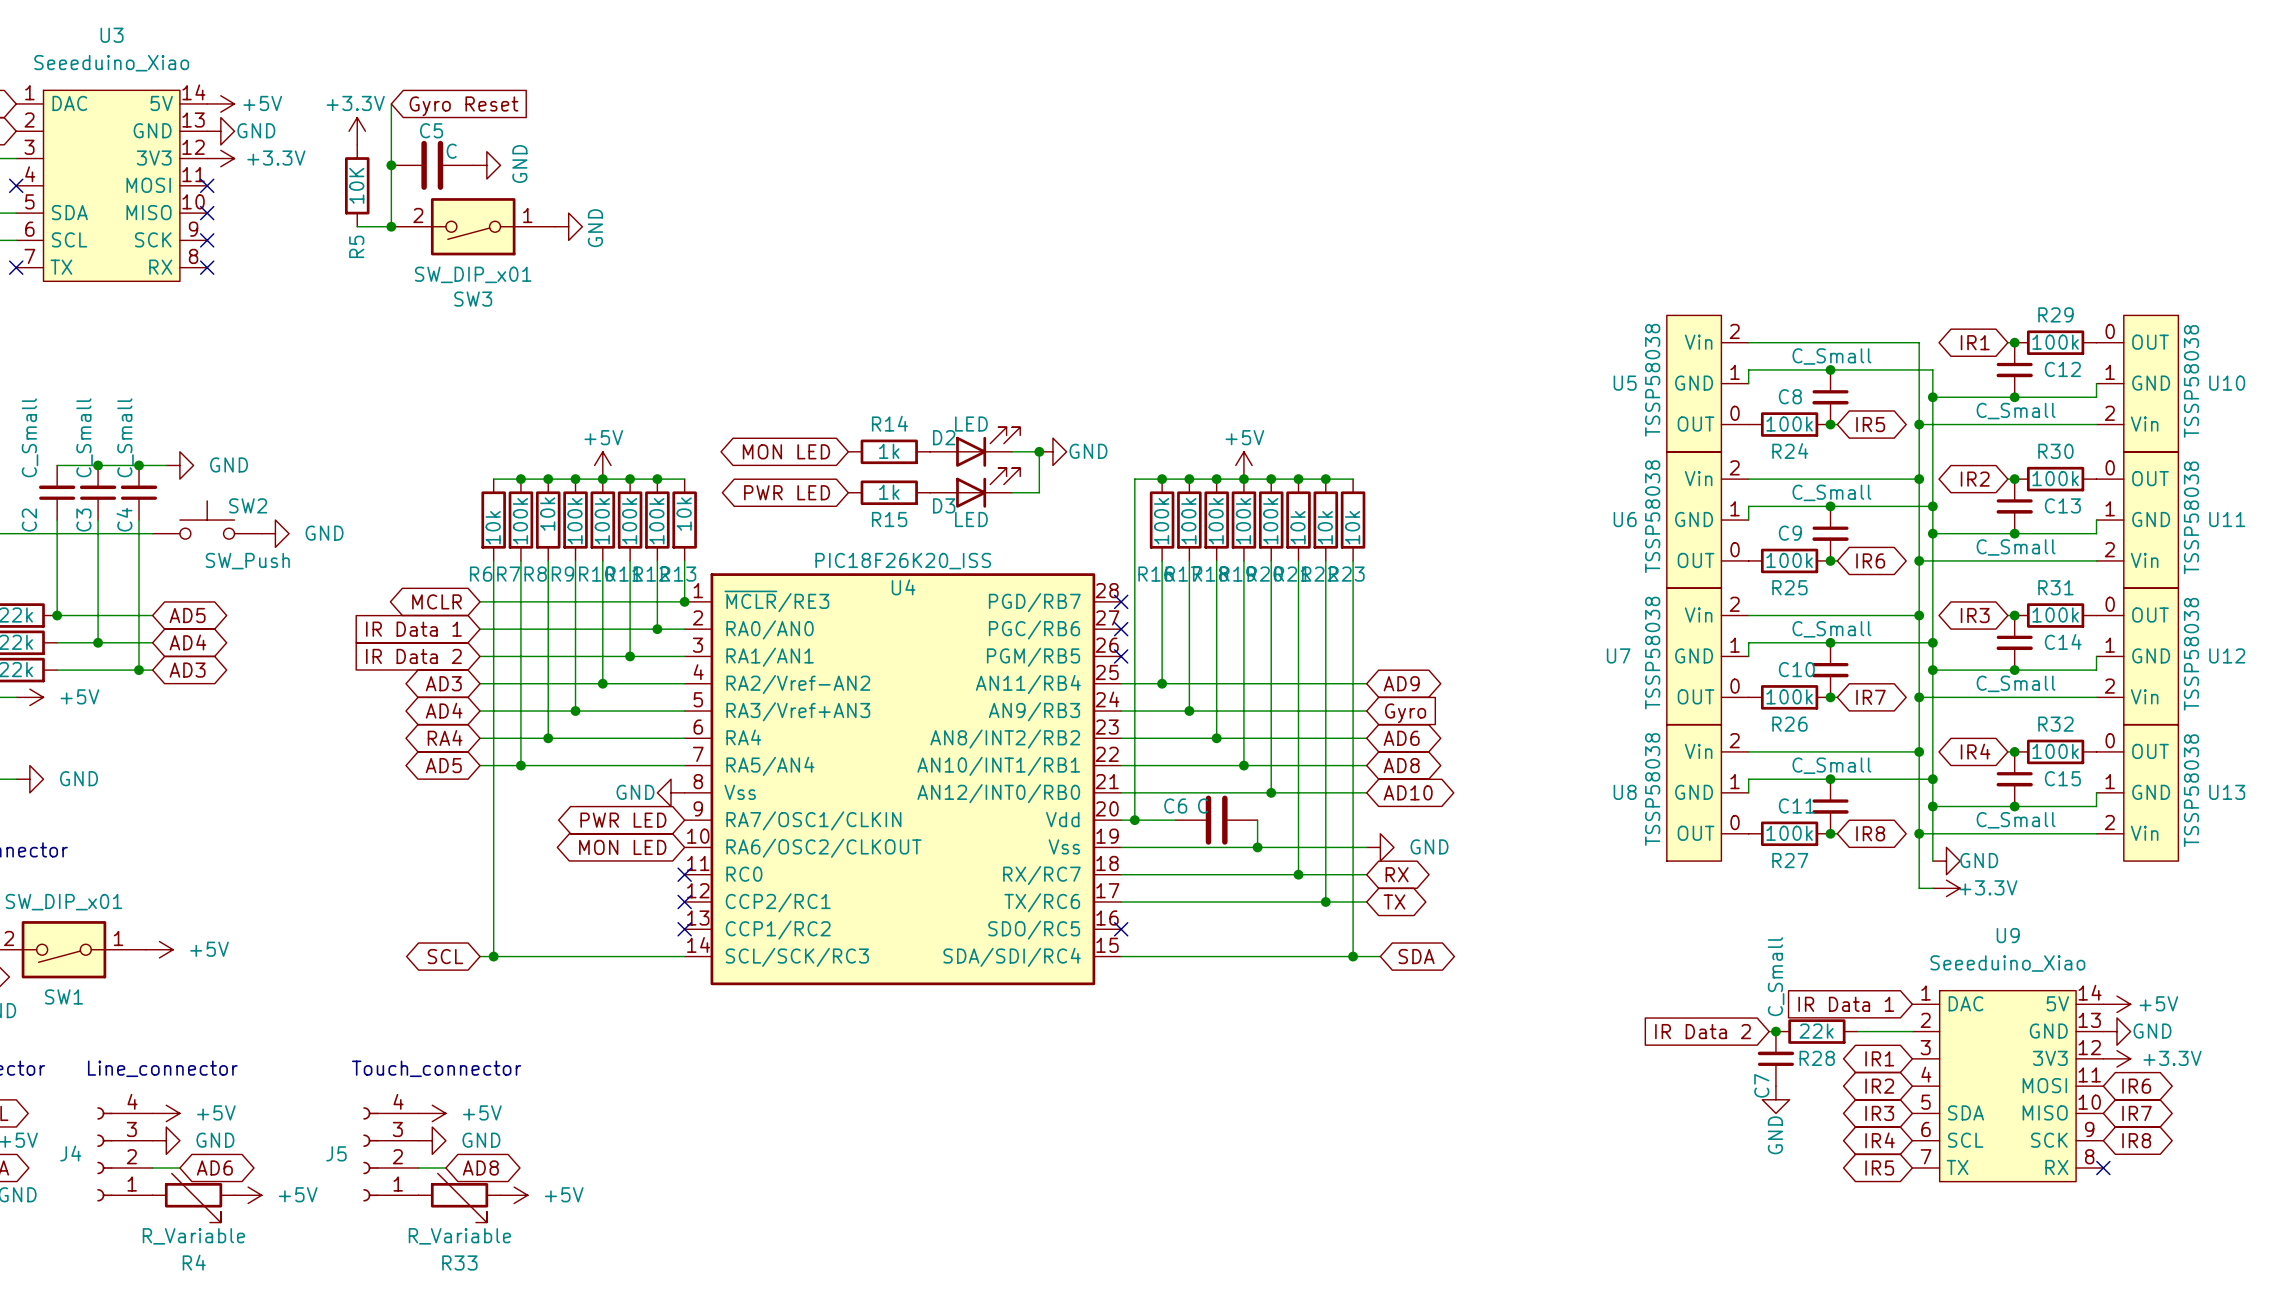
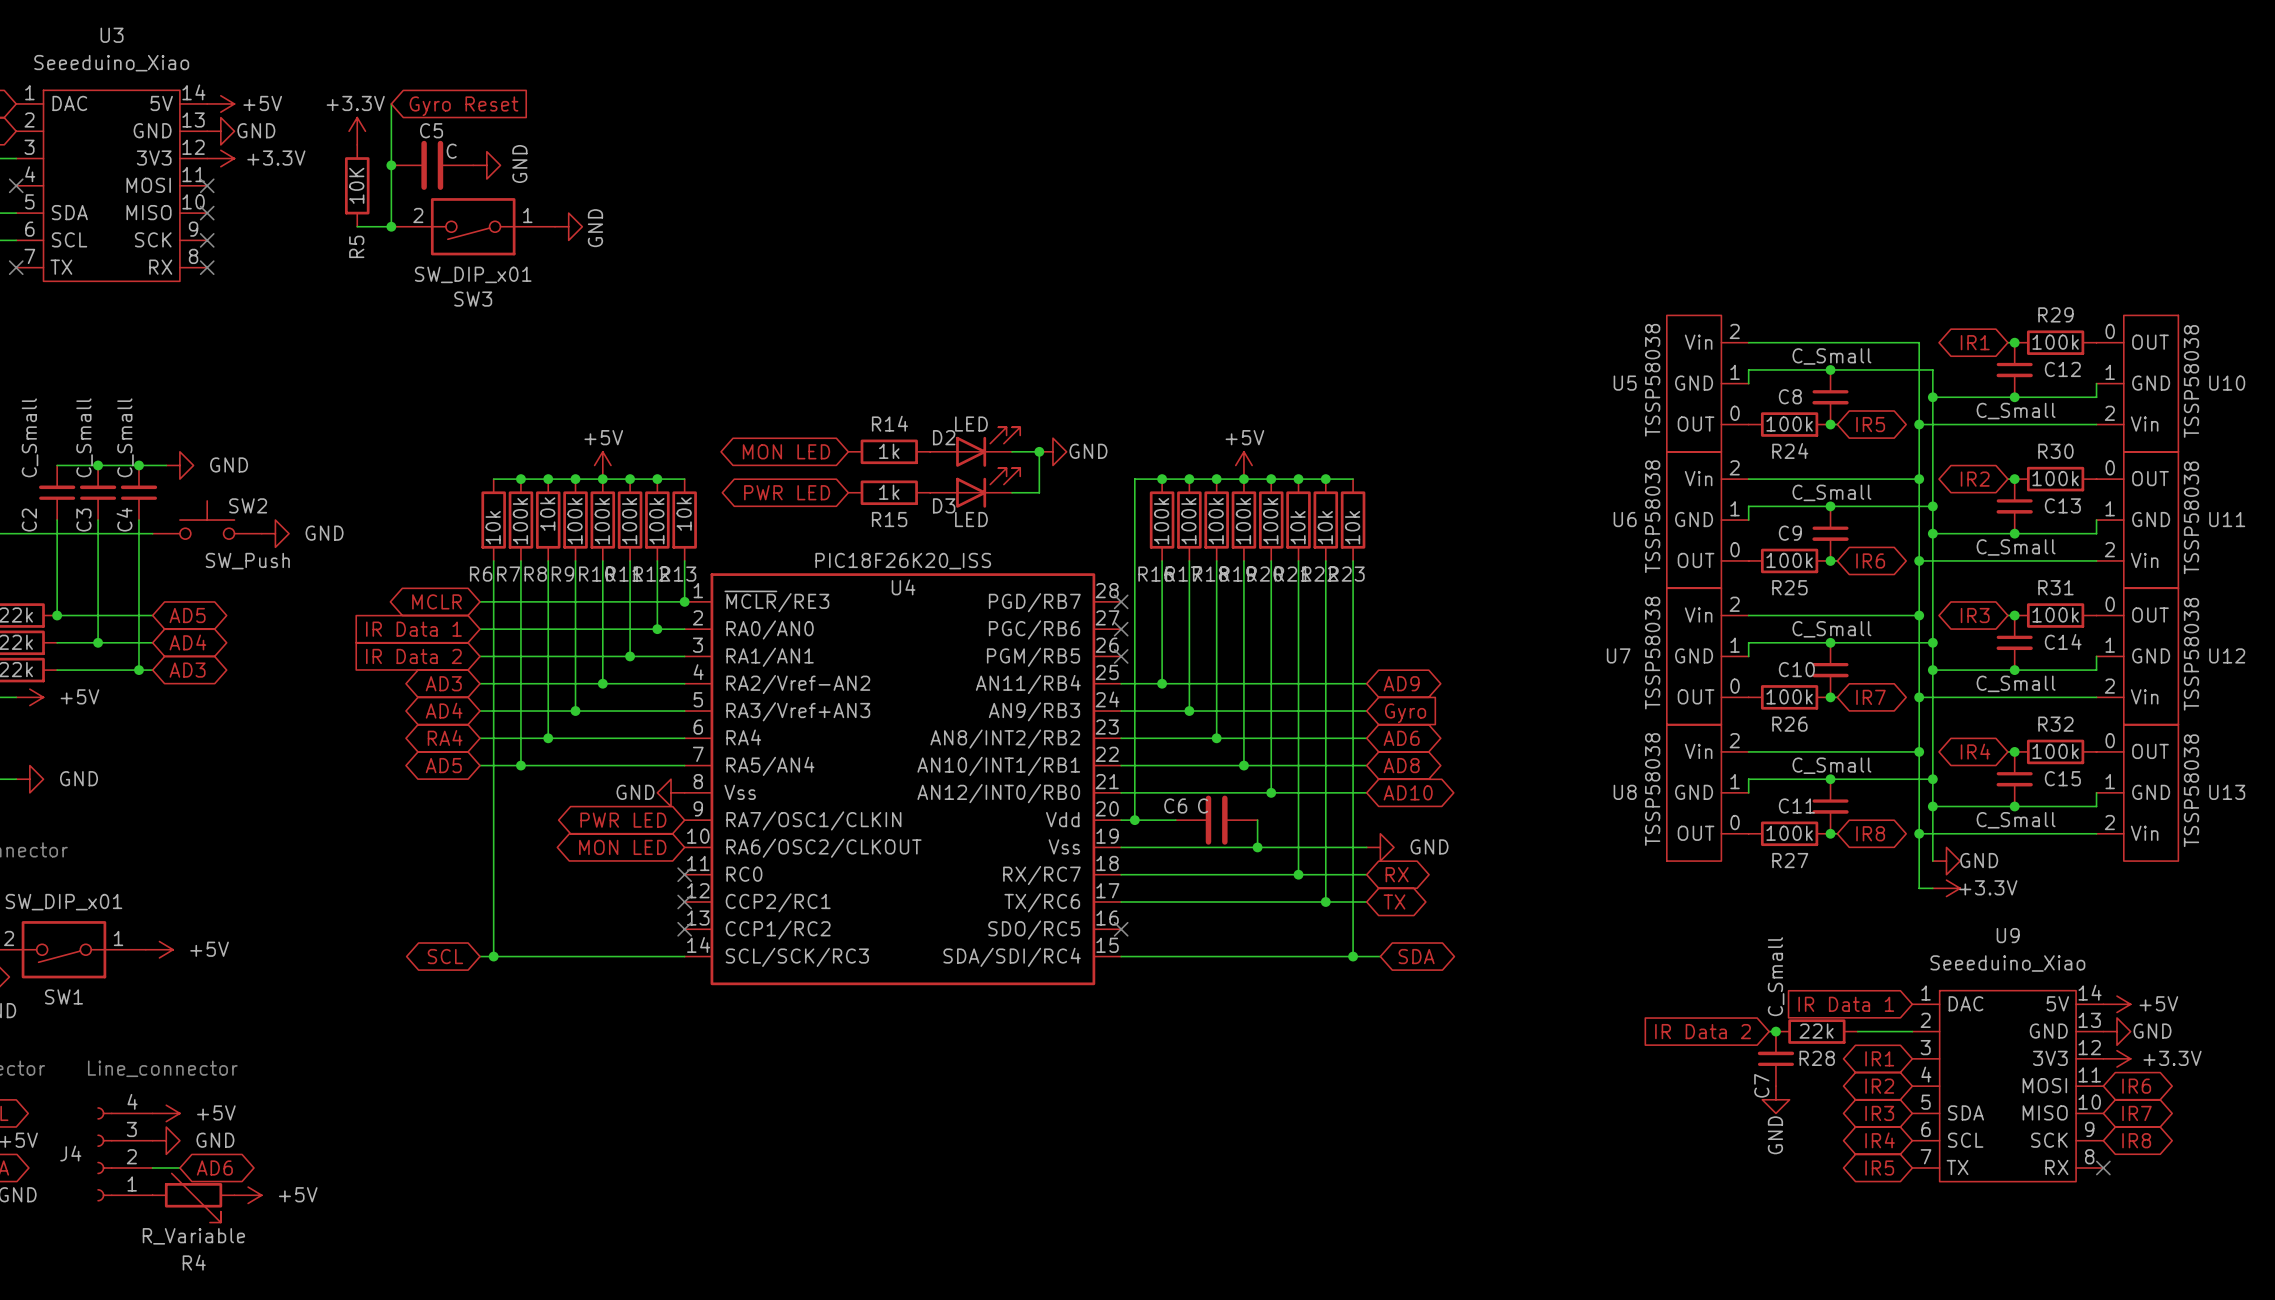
text: Touch_connector (436, 1068) -> none
power symbol: +5V (432, 1113) -> none
power symbol: GND (432, 1140) -> none
J5: (390, 1154) -> none
wire: (418, 1167) (445, 1167) -> none
global label: AD8 (480, 1167) -> none
power symbol: +5V (514, 1195) -> none
R33: R_Variable (459, 1198) -> none

